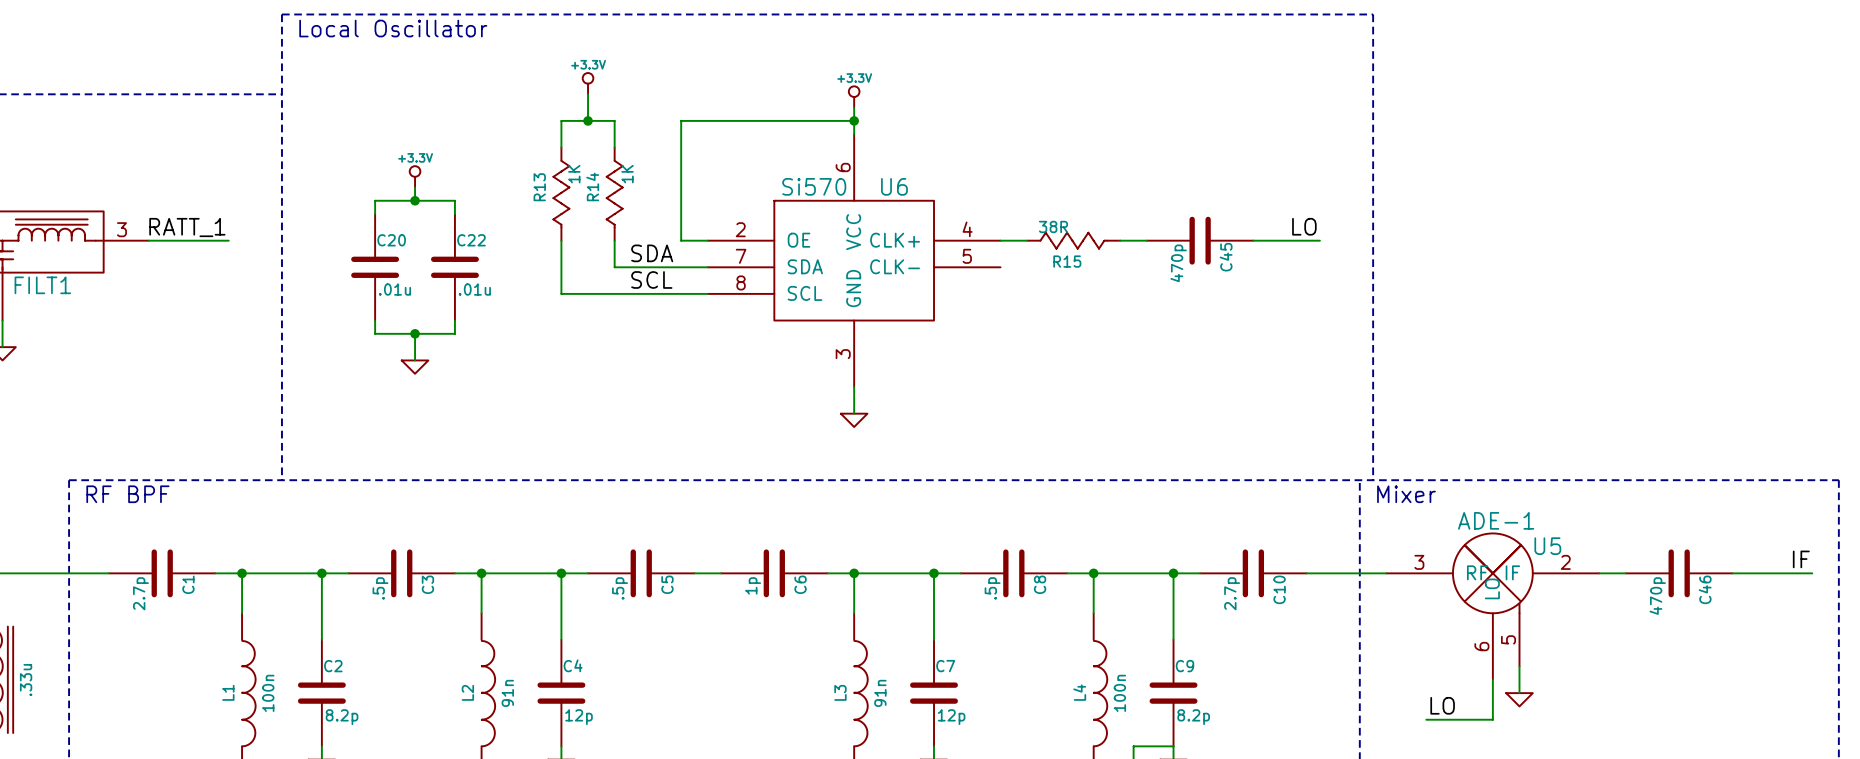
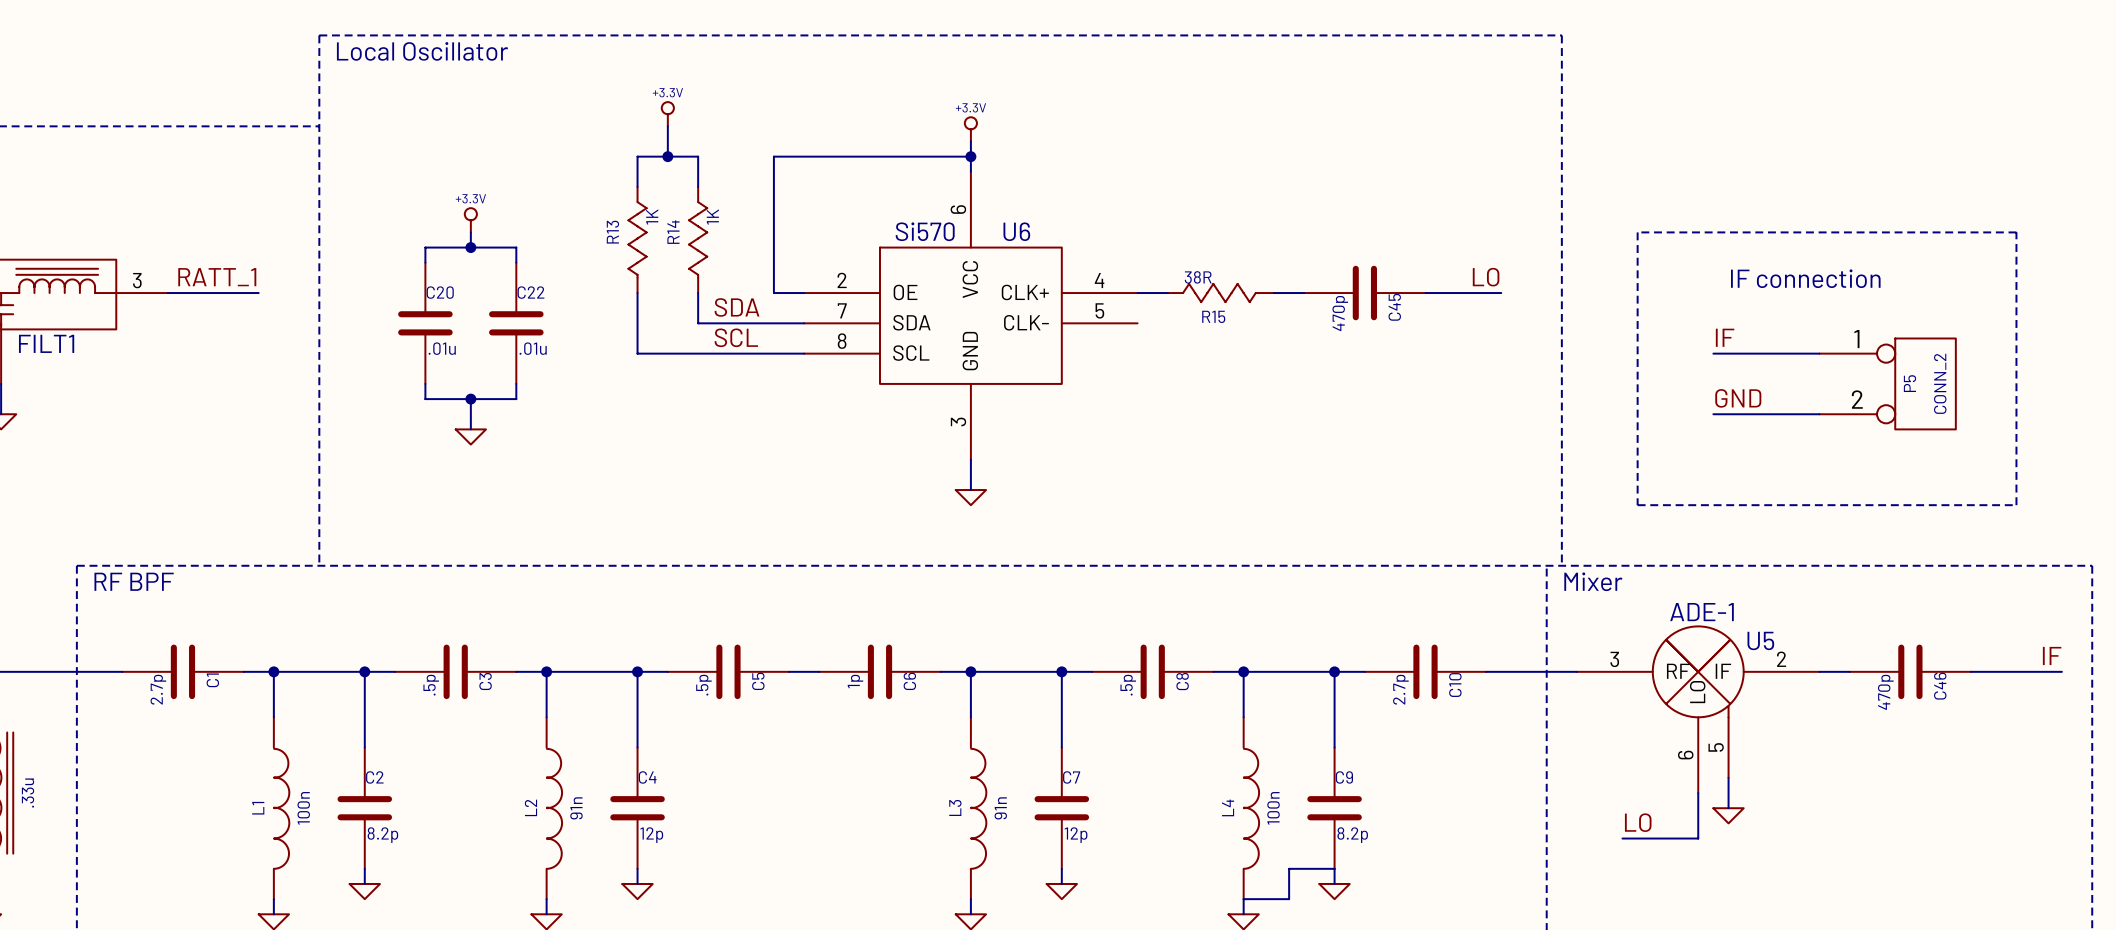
line: none -> (1637, 232) (1637, 505) (2016, 505) (2016, 232) (1637, 232)
text: none -> IF connection (1805, 278)
label: none -> IF (1725, 337)
wire: none -> (1713, 353) (1819, 353)
P5: none -> CONN_2 (1887, 383)
label: none -> GND (1738, 398)
wire: none -> (1713, 414) (1819, 414)

